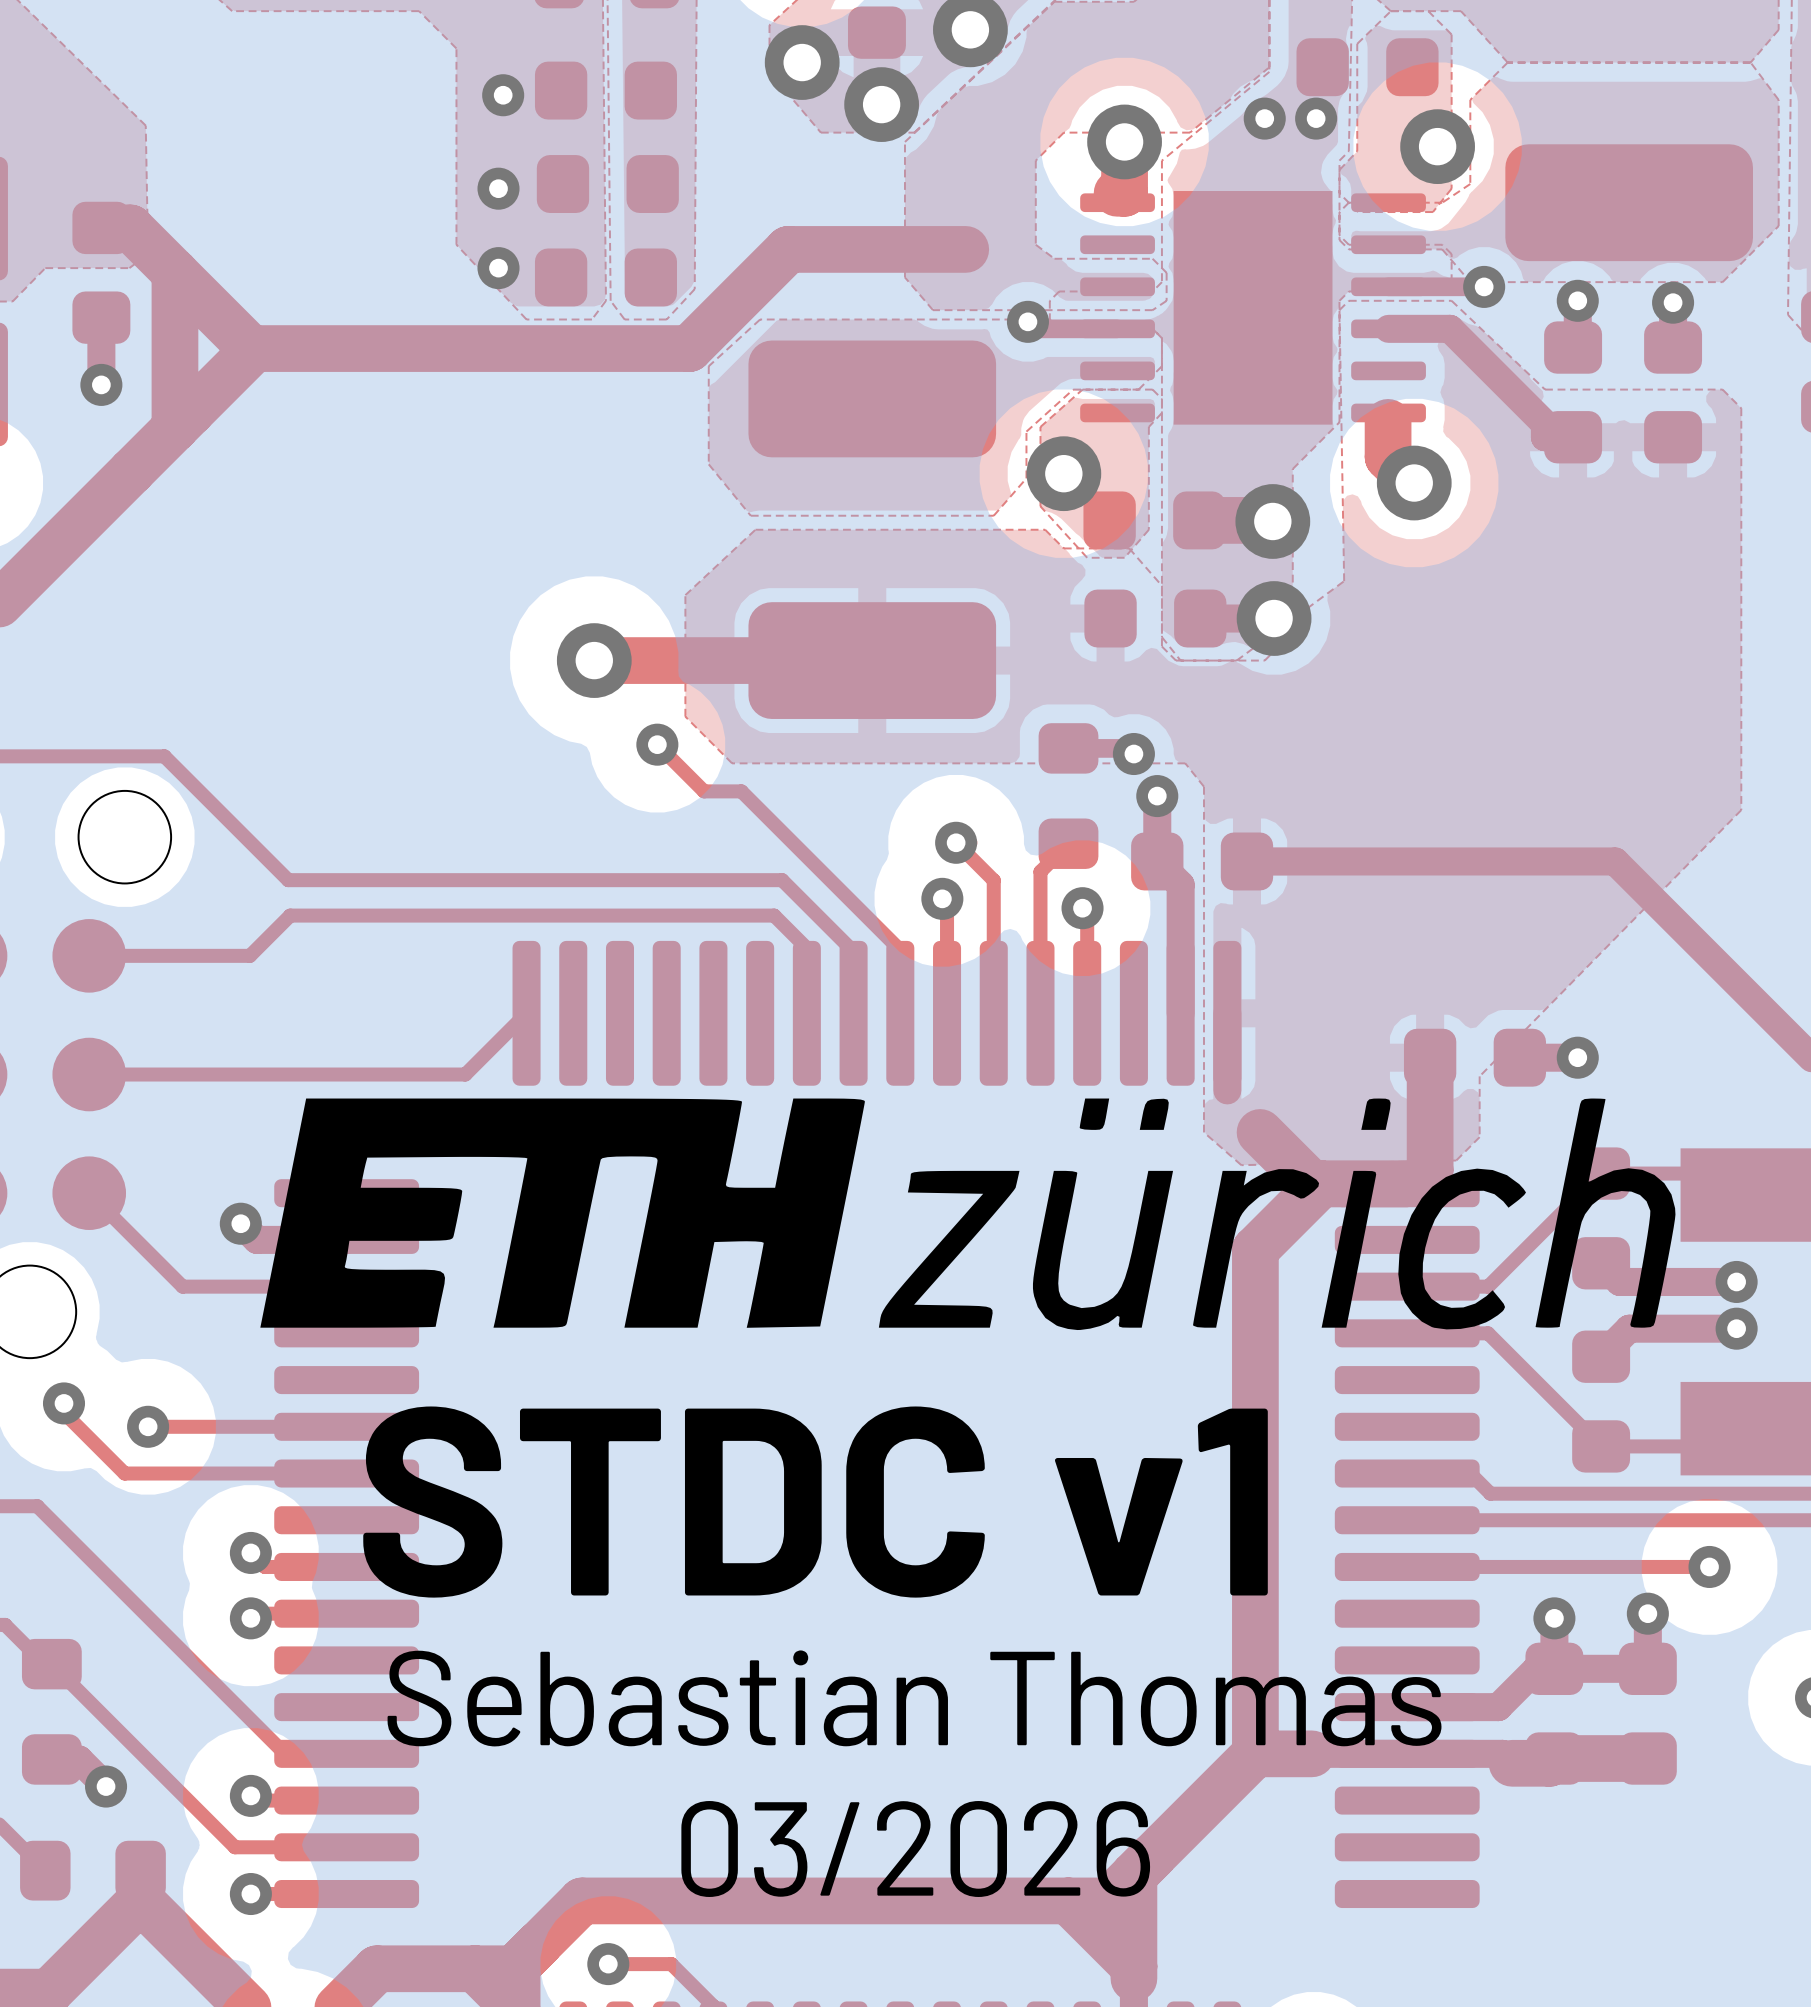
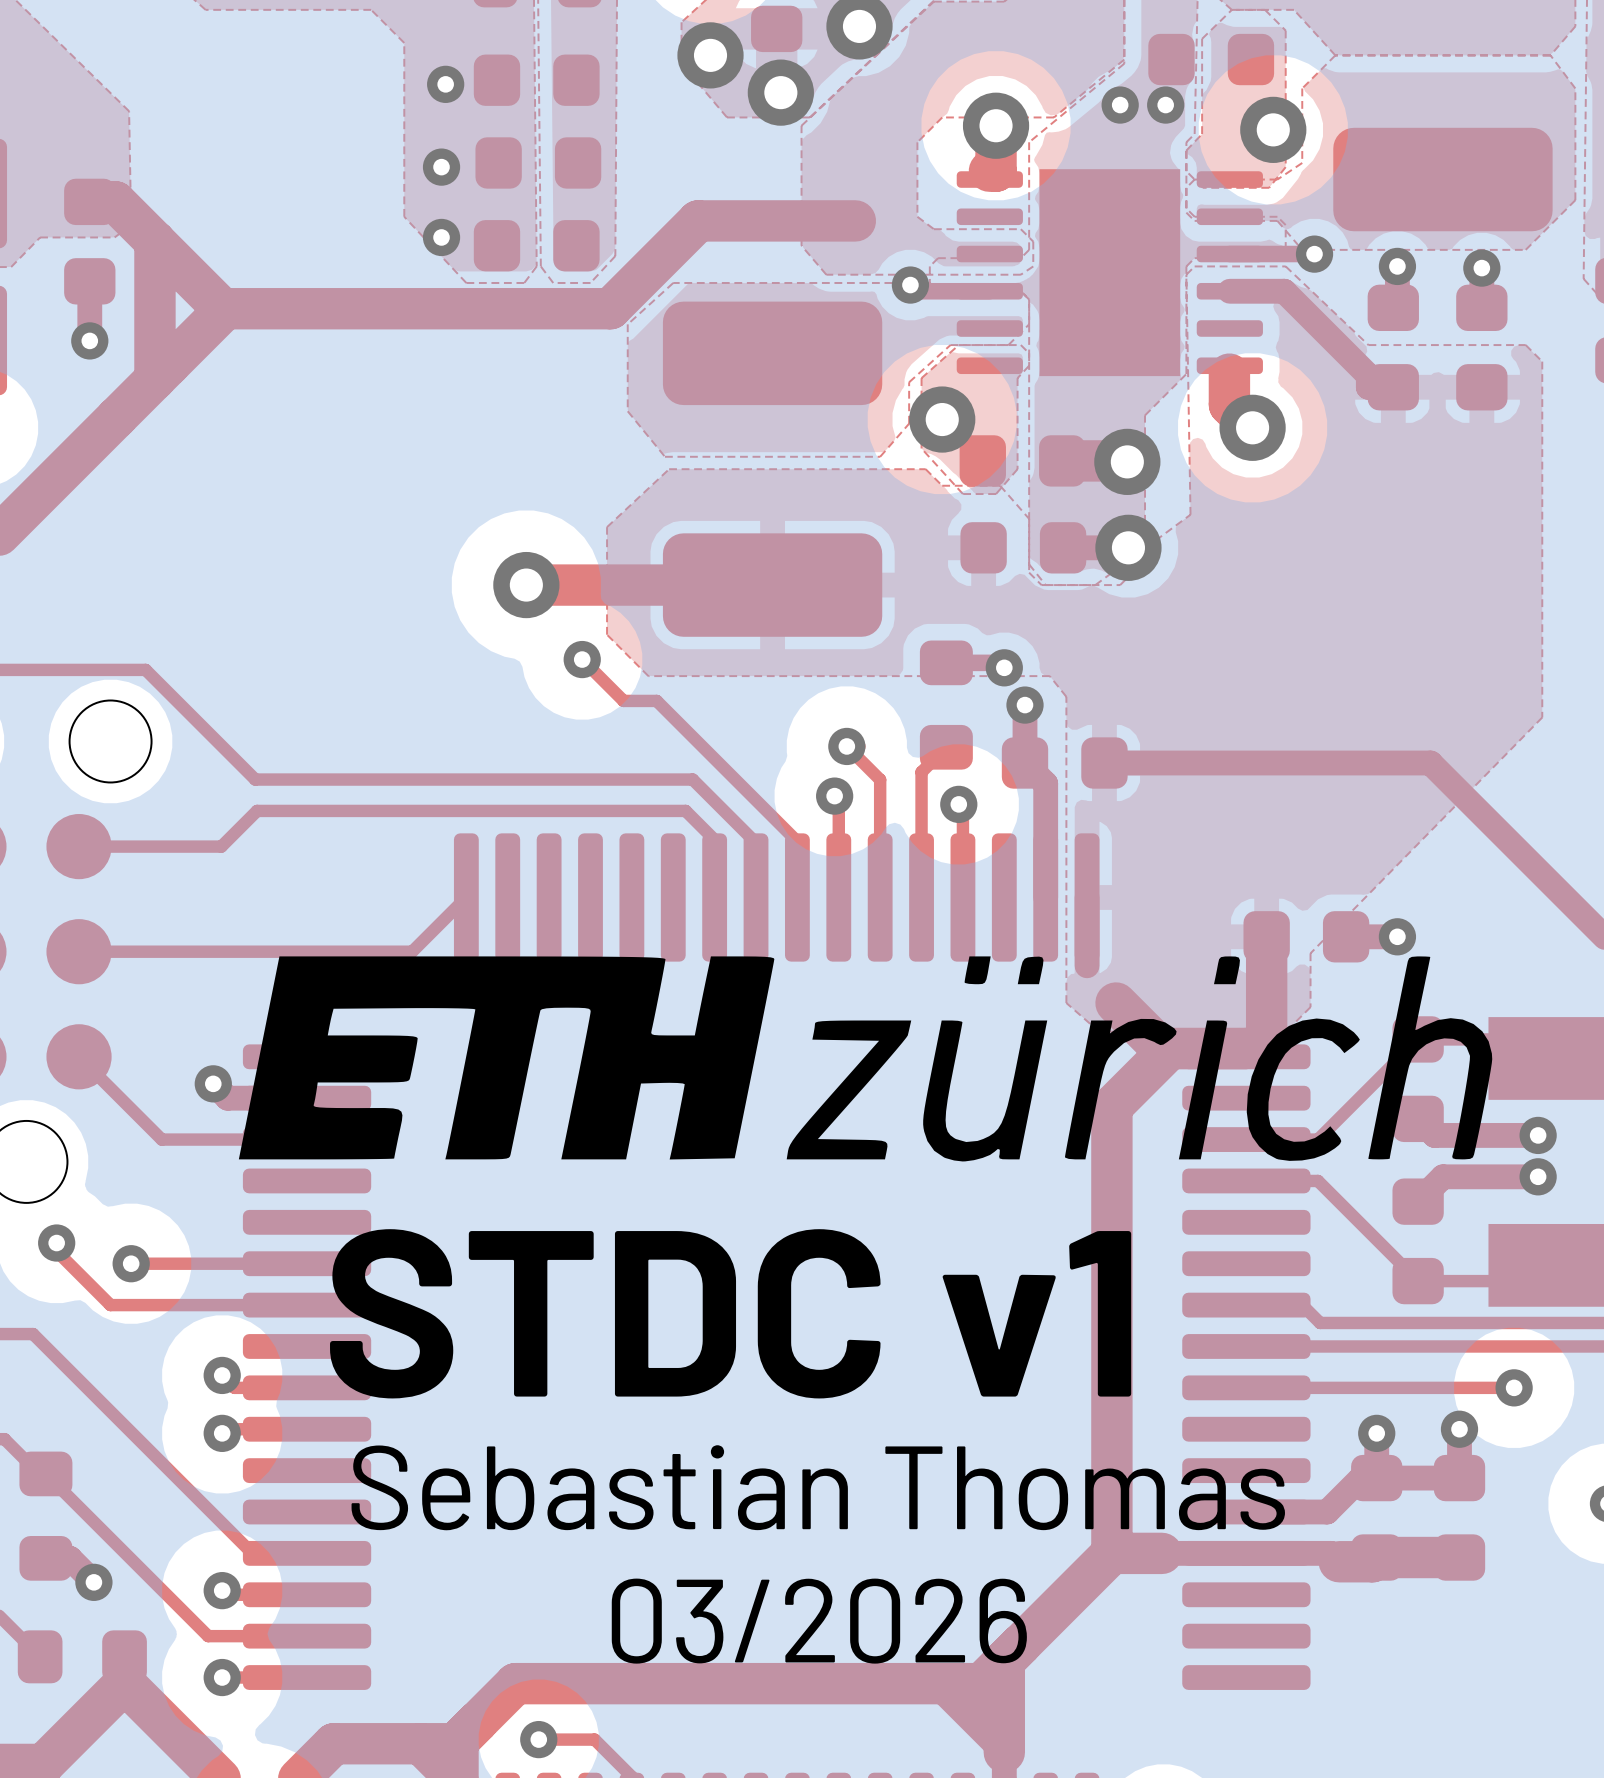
drawing position: (967, 1214) -> (865, 1058)
text position: STDC v1 (815, 1502) -> STDC v1 (730, 1313)
text position: Sebastian Thomas (914, 1698) -> Sebastian Thomas (818, 1487)
text position: 03/2026 (915, 1849) -> 03/2026 (819, 1621)

